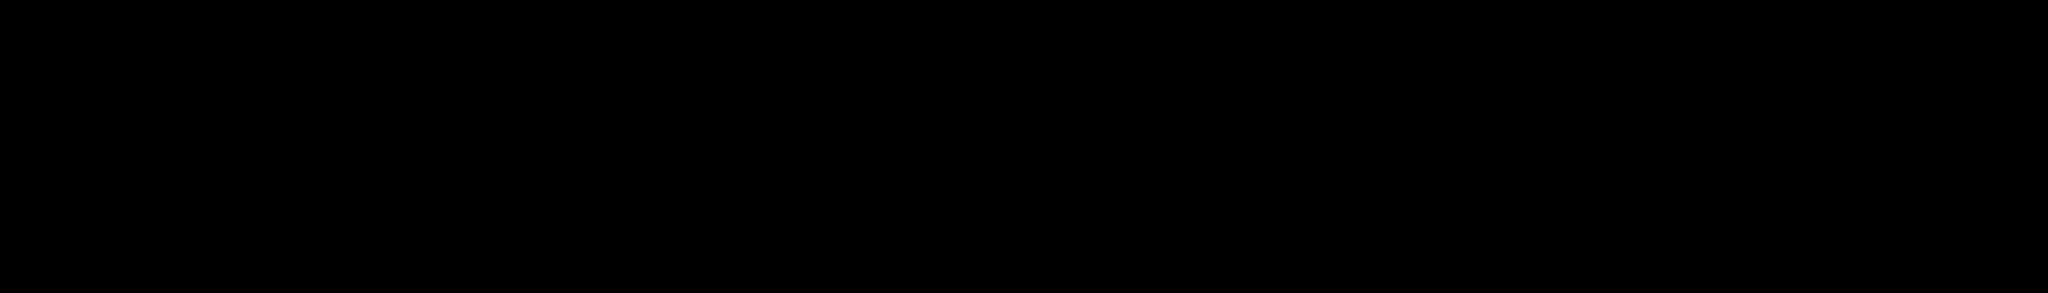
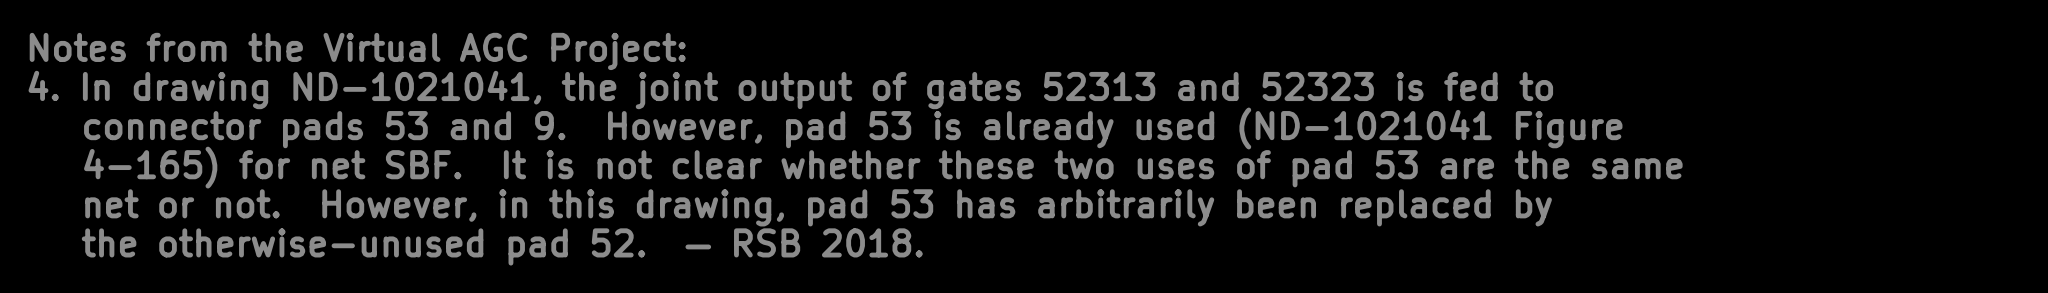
text: none -> Notes from the Virtual AGC Project: (357, 51)
text: none -> 4. In drawing ND-1021041, the joint output of gates 52313 and 52323 is fed to (790, 89)
text: none -> connector pads 53 and 9. However, pad 53 is already used (ND-1021041 Figure (853, 128)
text: none -> 4-165) for net SBF. It is not clear whether these two uses of pad 53 are the same (883, 167)
text: none -> net or not. However, in this drawing, pad 53 has arbitrarily been replaced by (818, 207)
text: none -> the otherwise-unused pad 52. — RSB 2018. (502, 246)

